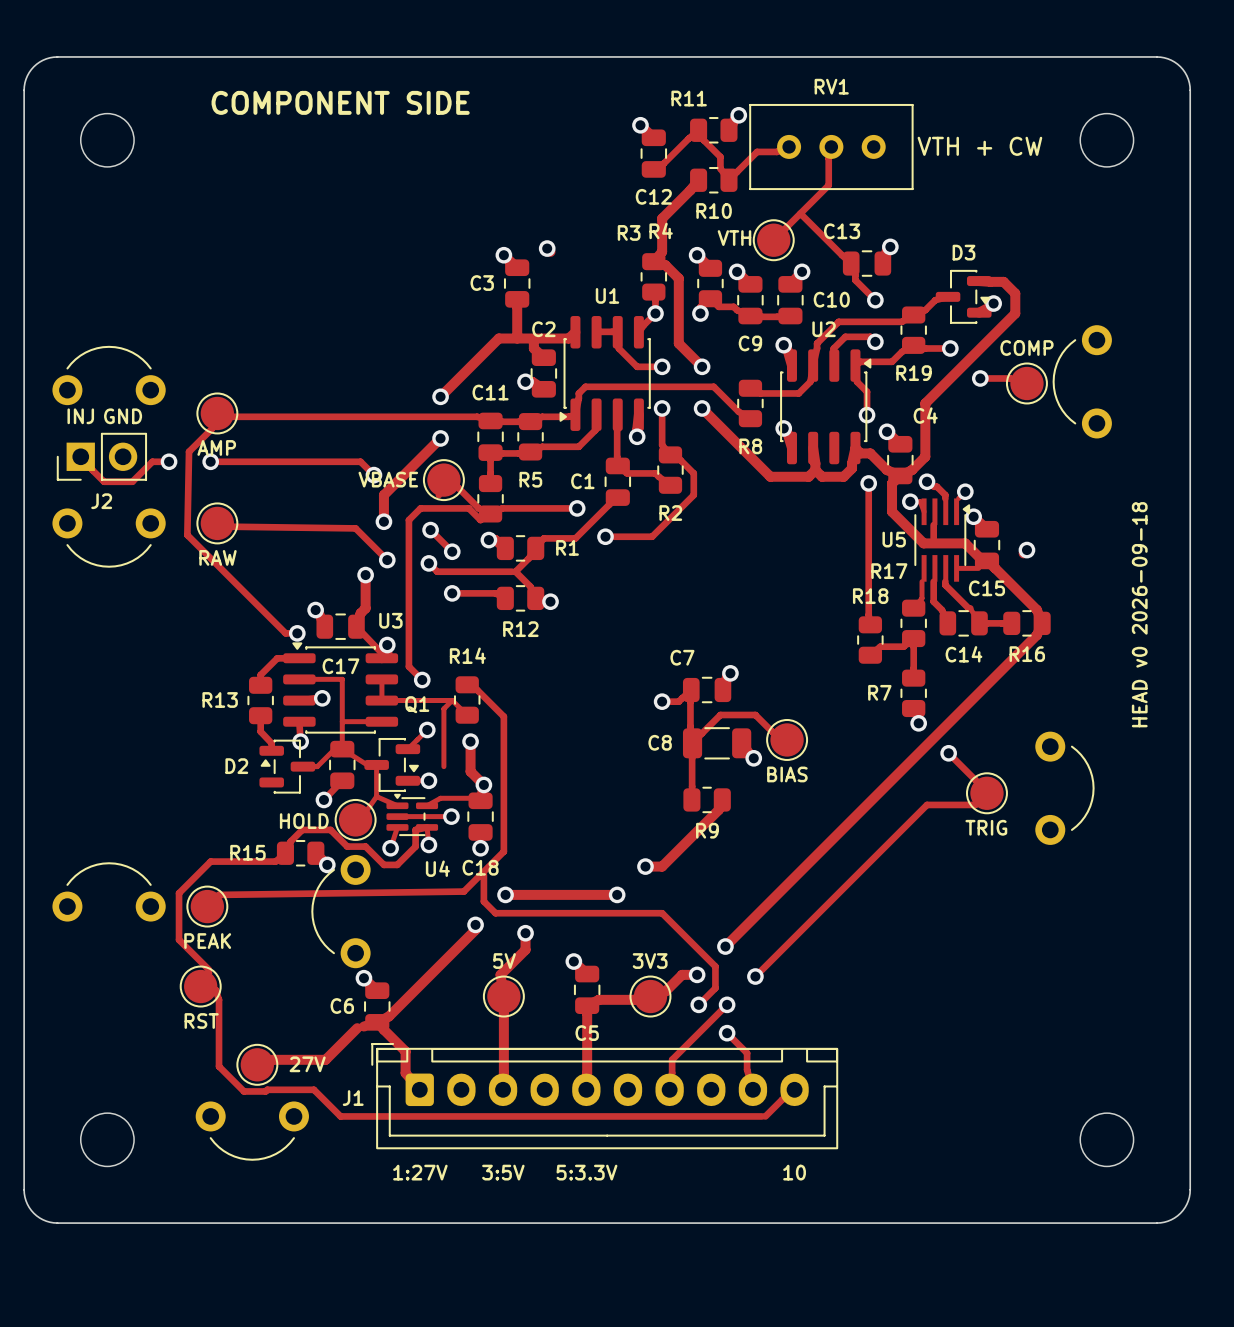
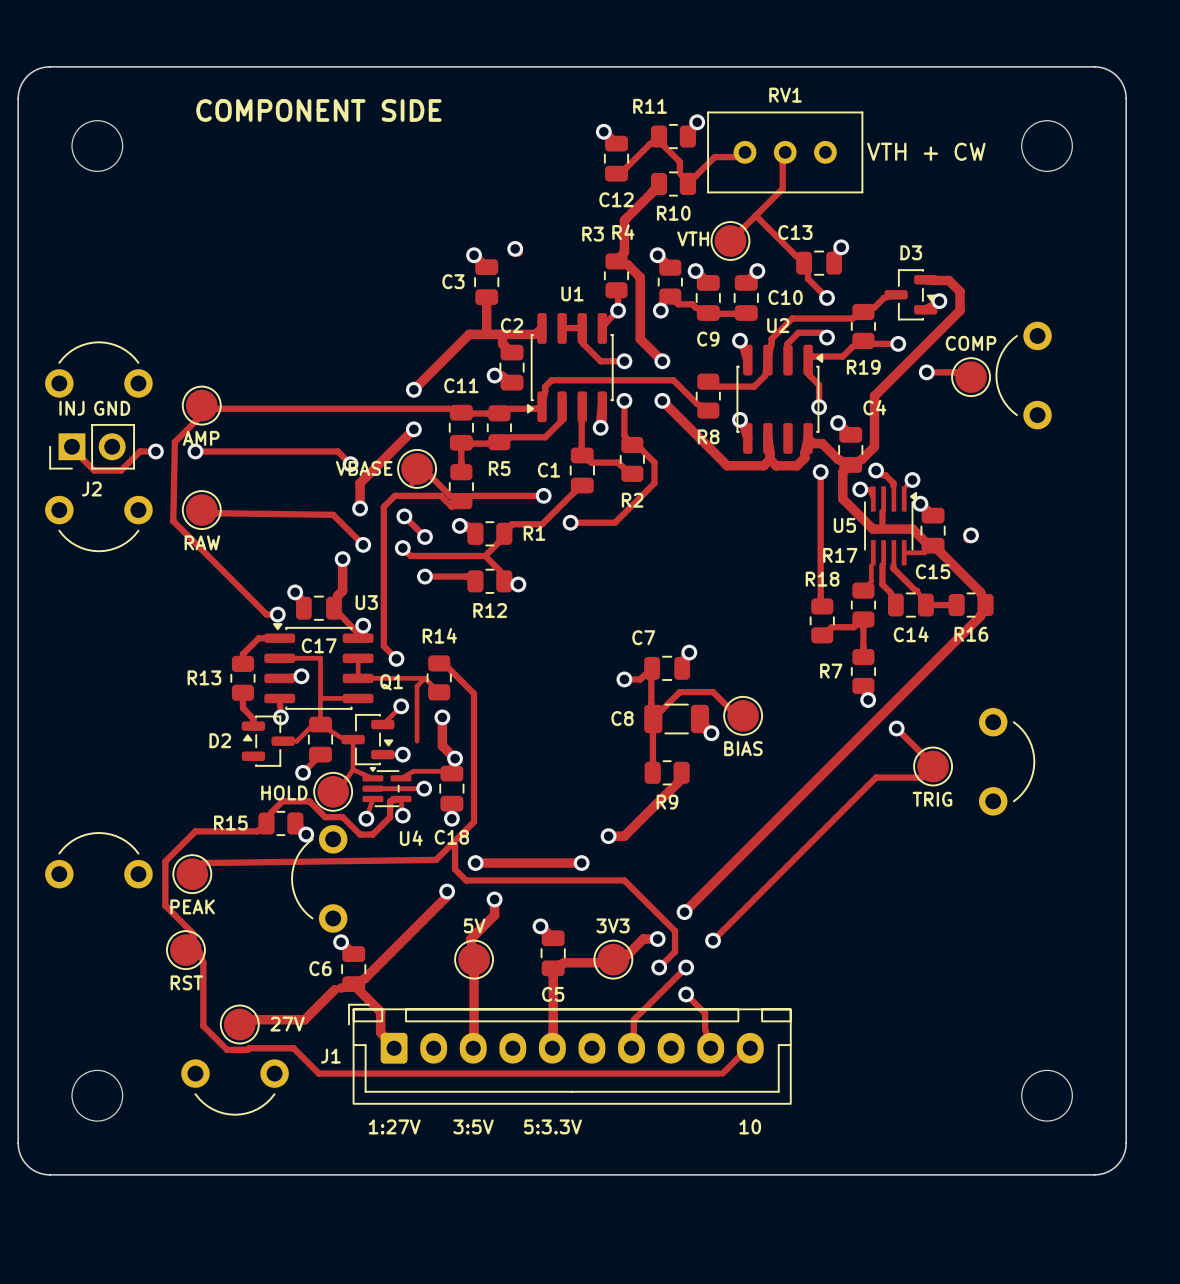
text: HEAD v0 2026-09-18 (1139, 614) -> none

